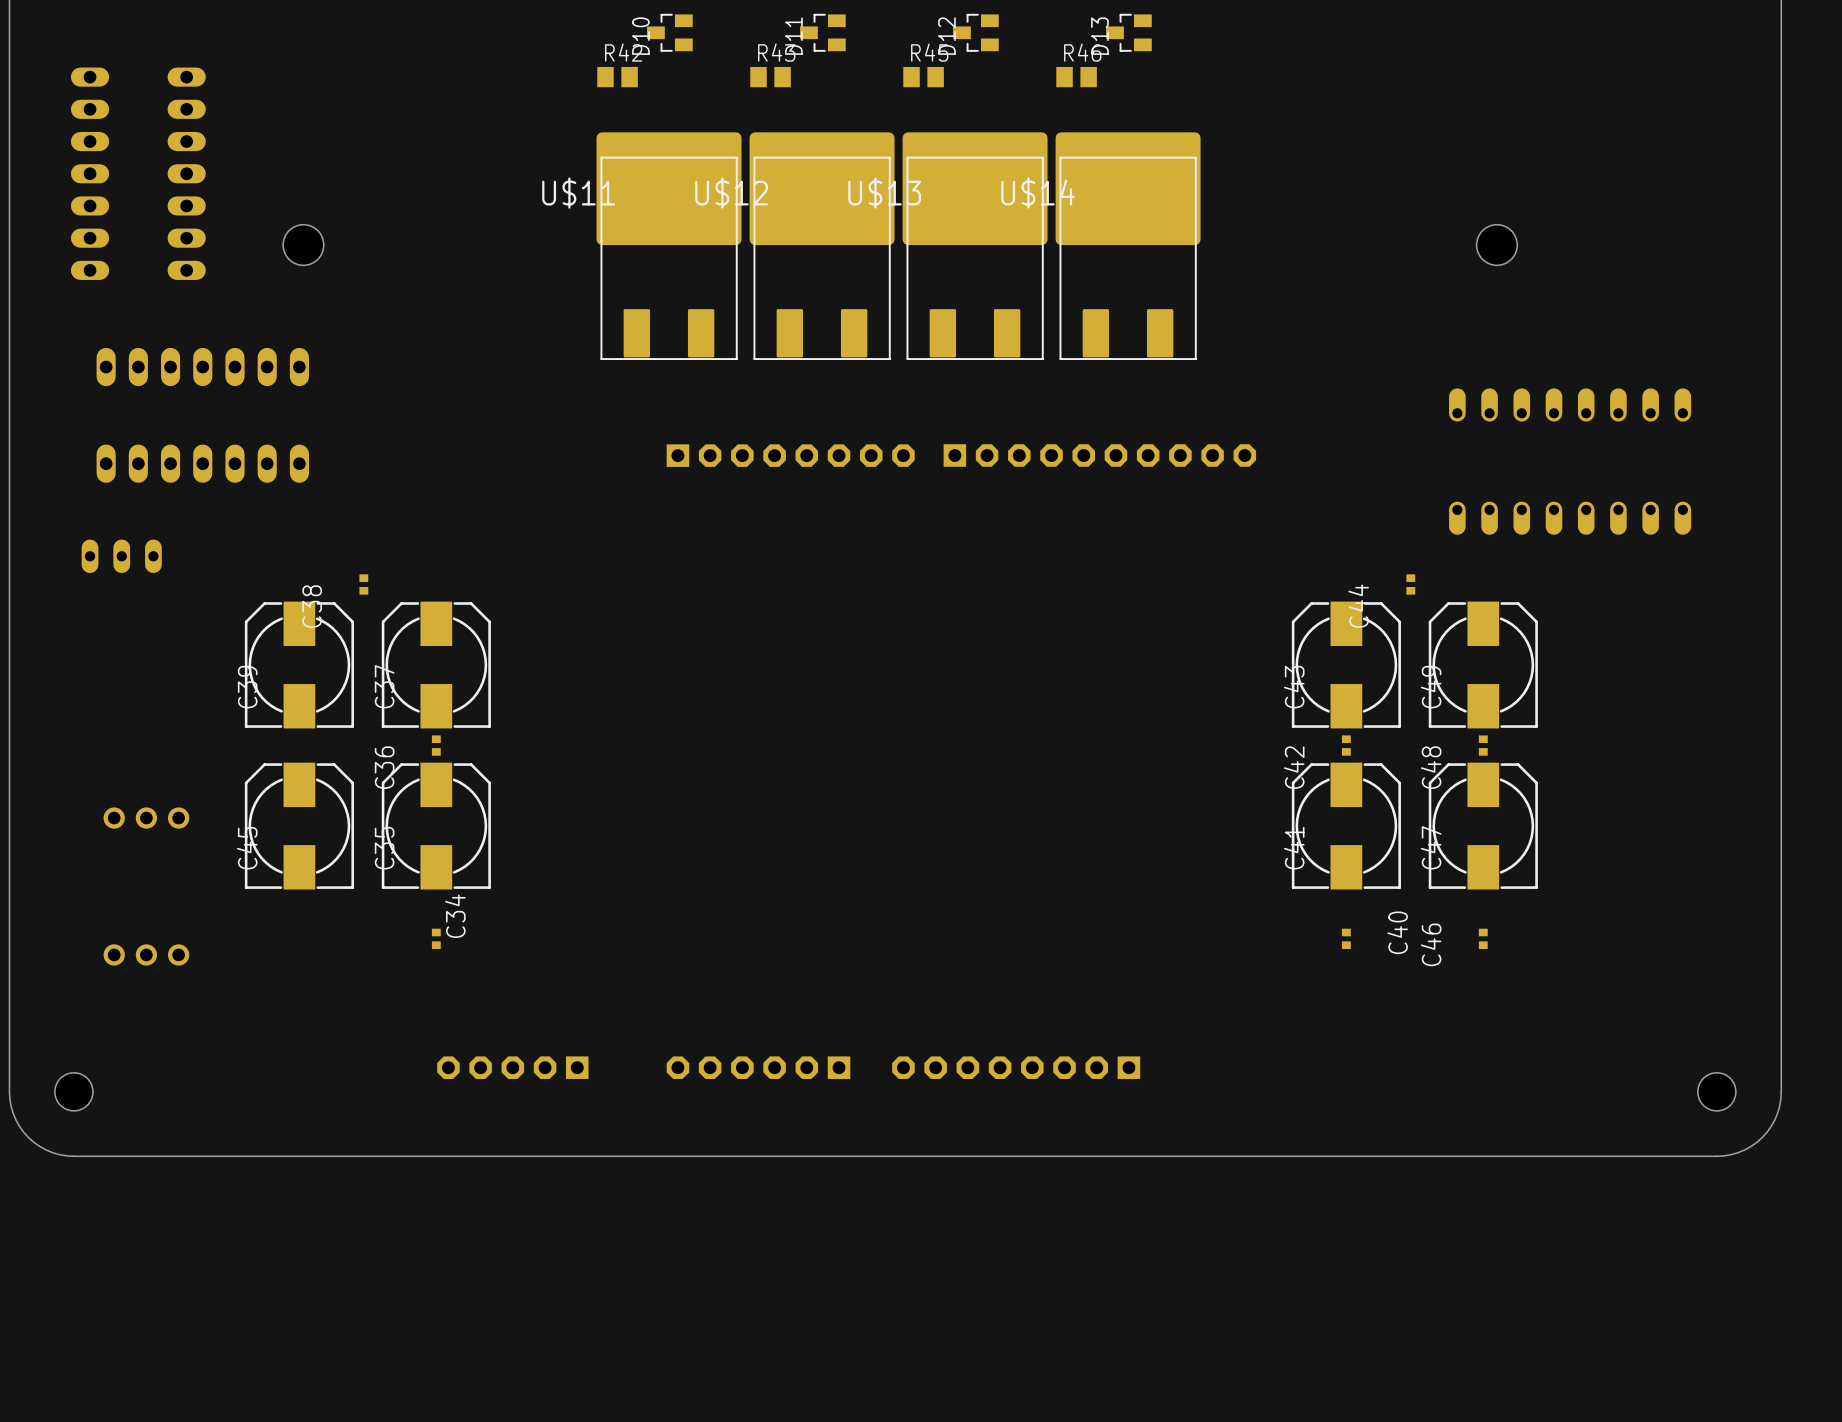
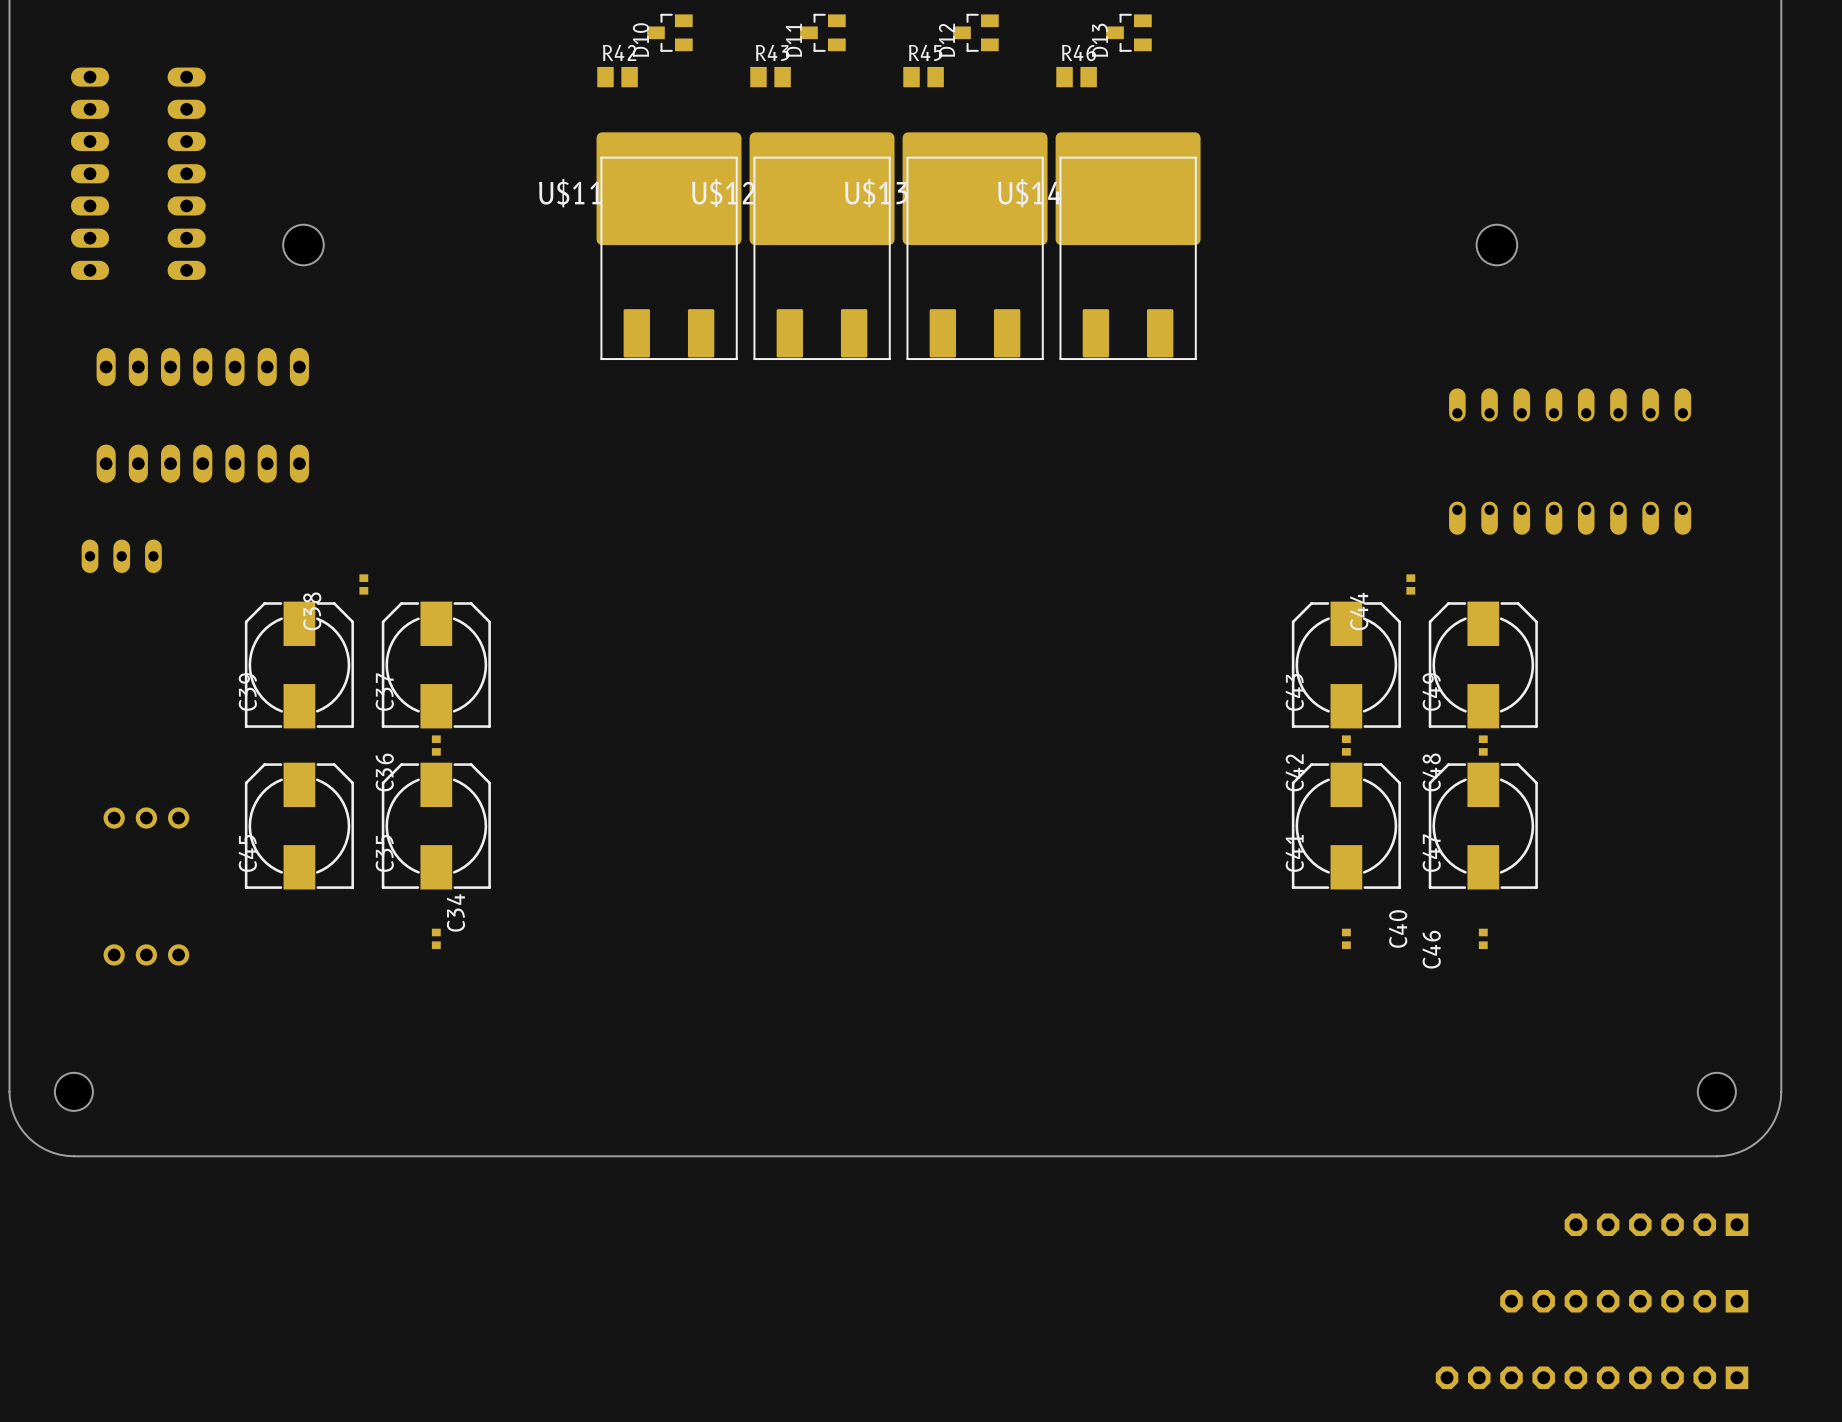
part: (790, 455) -> none
part: (1099, 455) -> none
part: (512, 1067) -> none
part: (758, 1067) -> none
part: (1016, 1067) -> none
part: none -> (1656, 1224)
part: none -> (1624, 1301)
part: none -> (1592, 1377)

